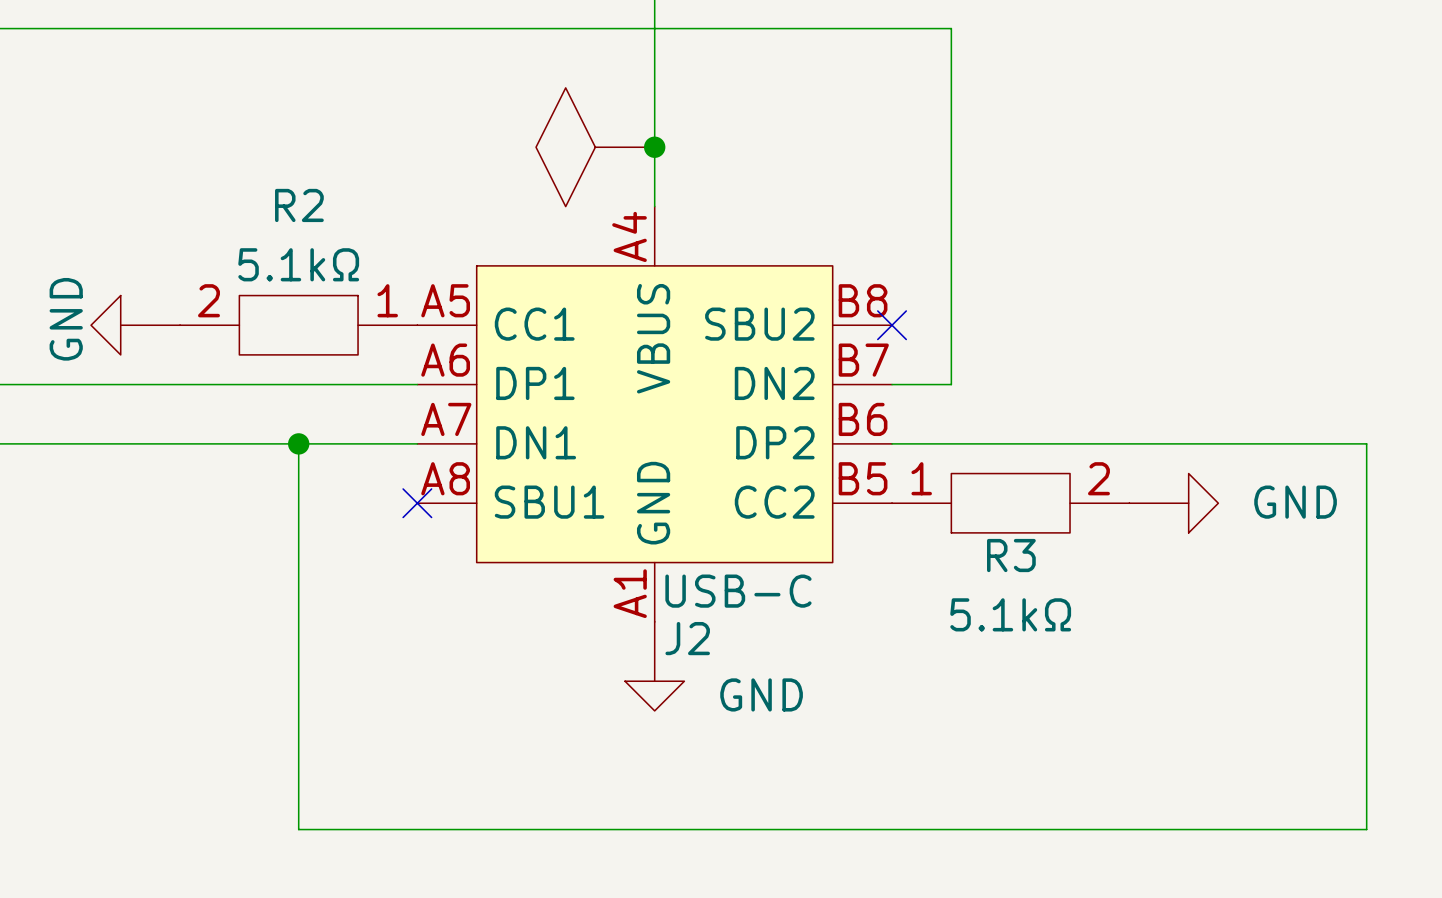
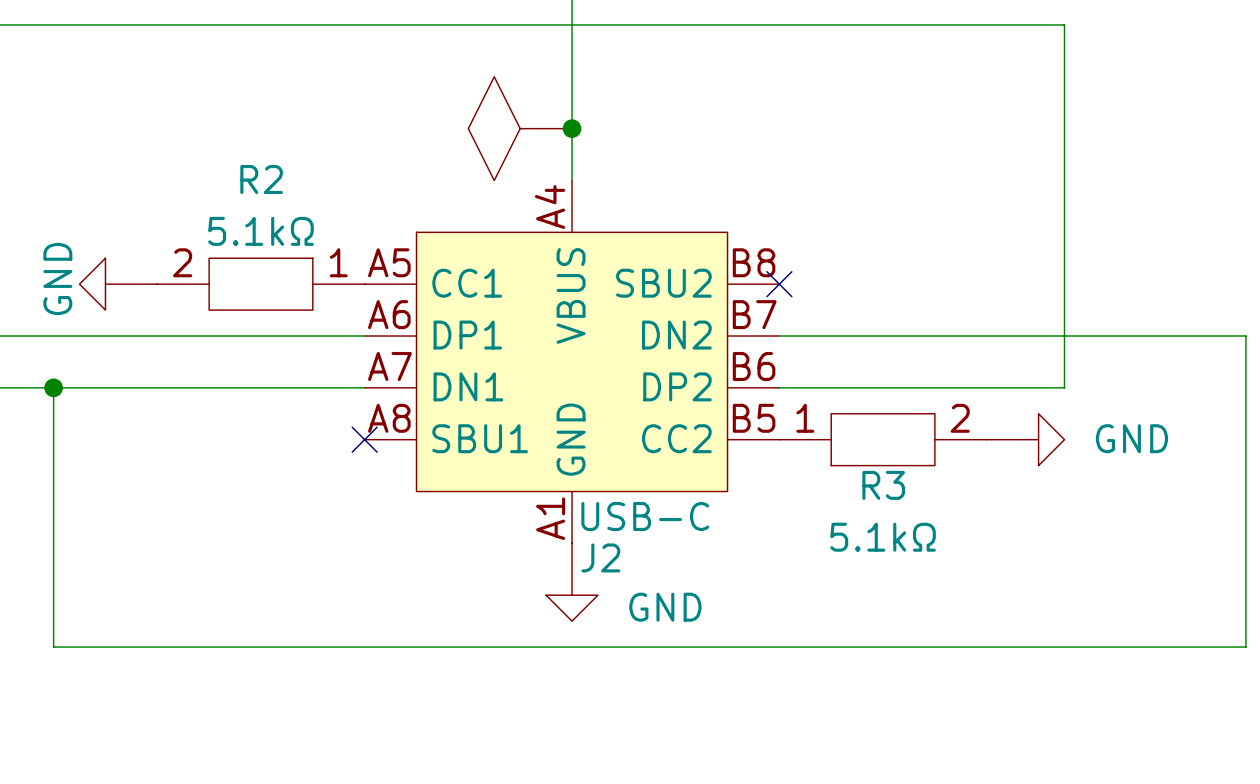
wire: (951, 28) (951, 384) -> (831, 24) (1064, 24) (1064, 387)
wire: none -> (831, 336) (1245, 336) (1245, 647) (53, 647) (53, 387)
junction: none -> (53, 387)
wire: (298, 443) (298, 829) (1366, 829) (1366, 443) (1218, 443) -> none
junction: (298, 443) -> none

